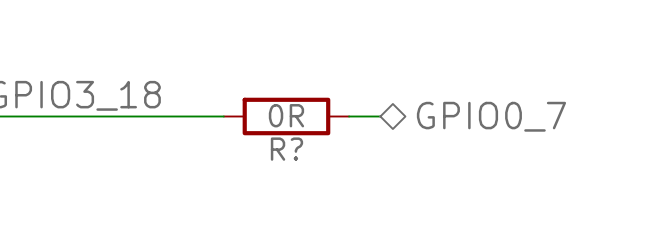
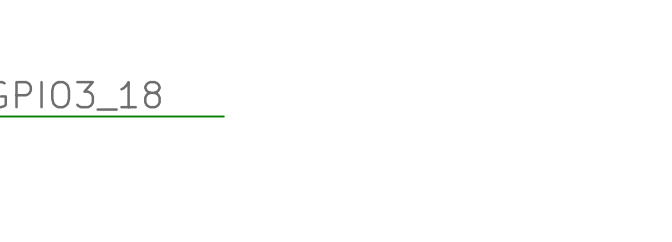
R?: 0R (286, 116) -> none
wire: (349, 116) (380, 116) -> none
hierarchical label: GPIO0_7 (491, 116) -> none

